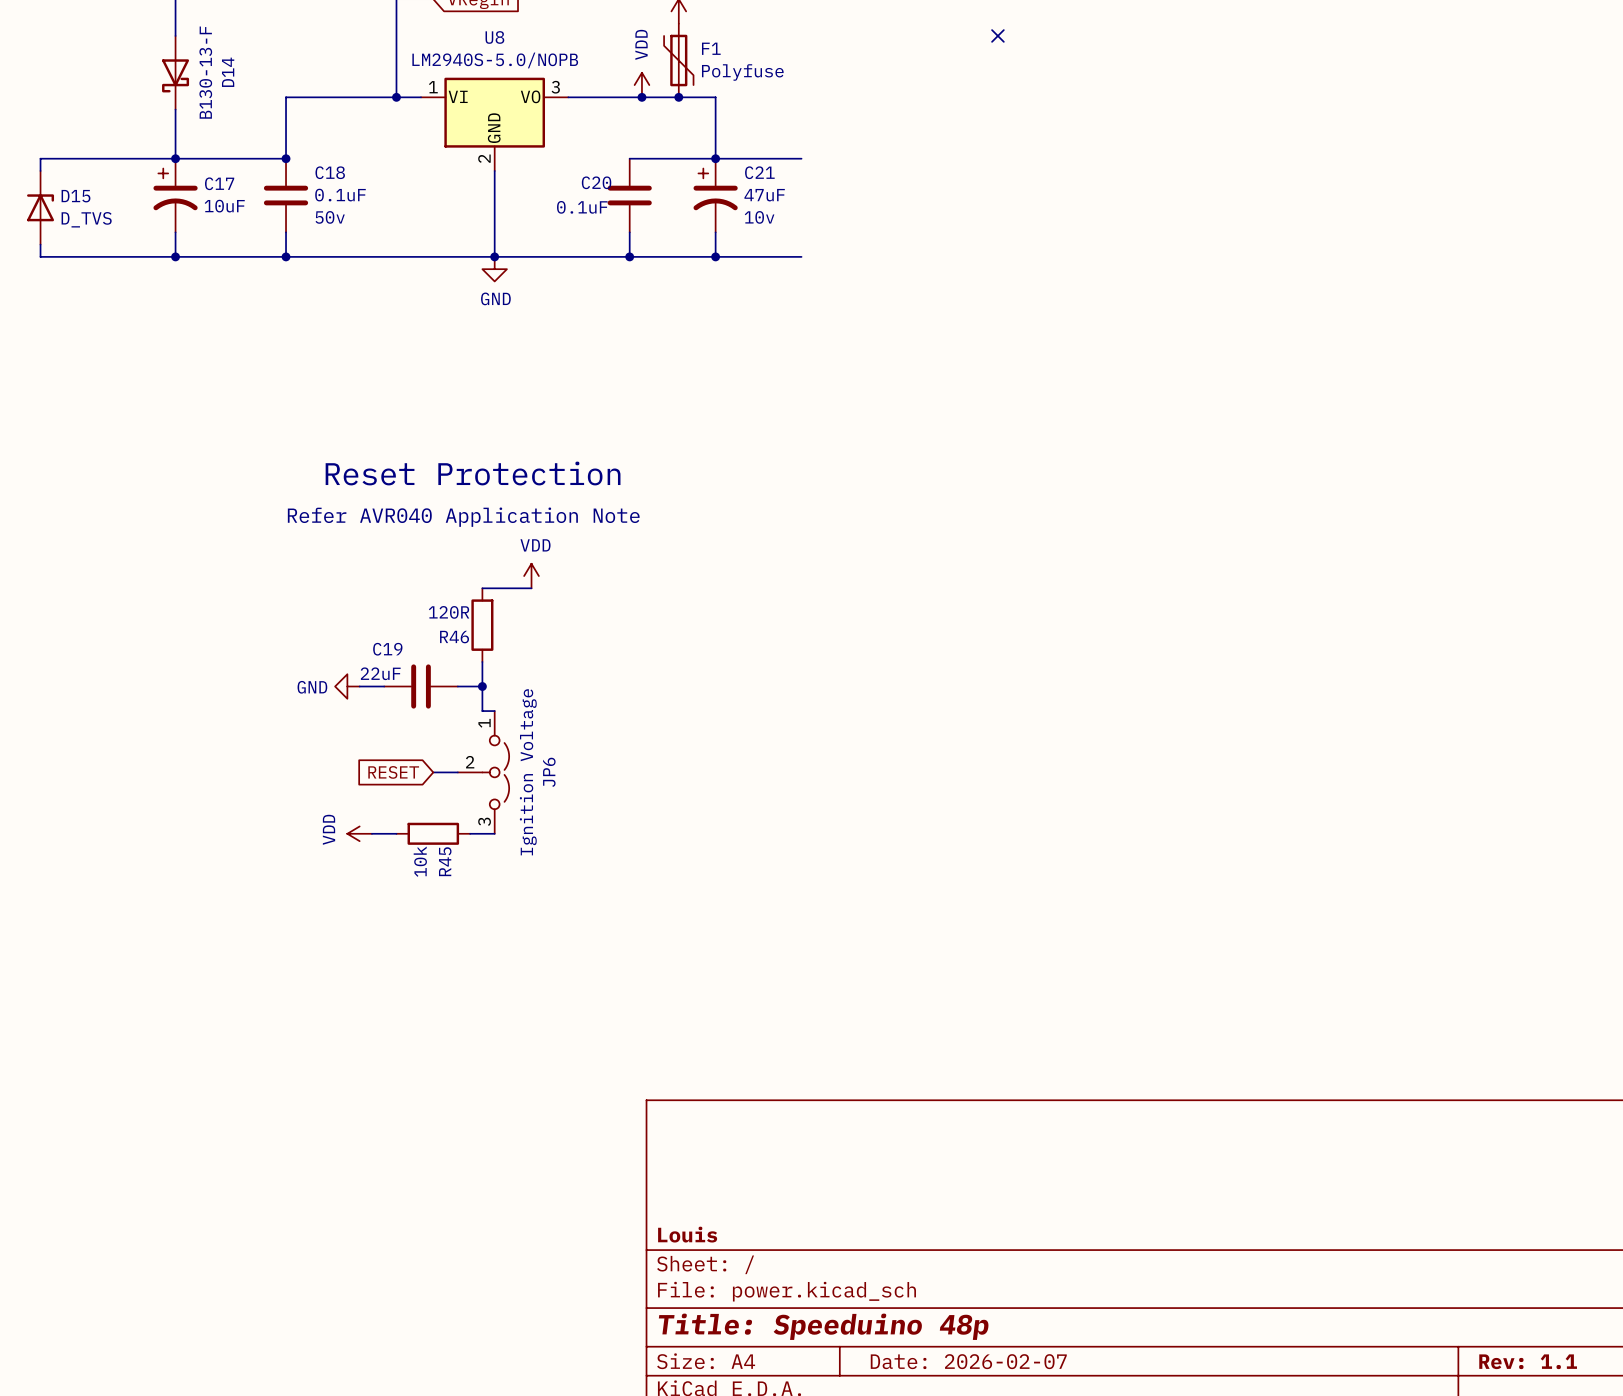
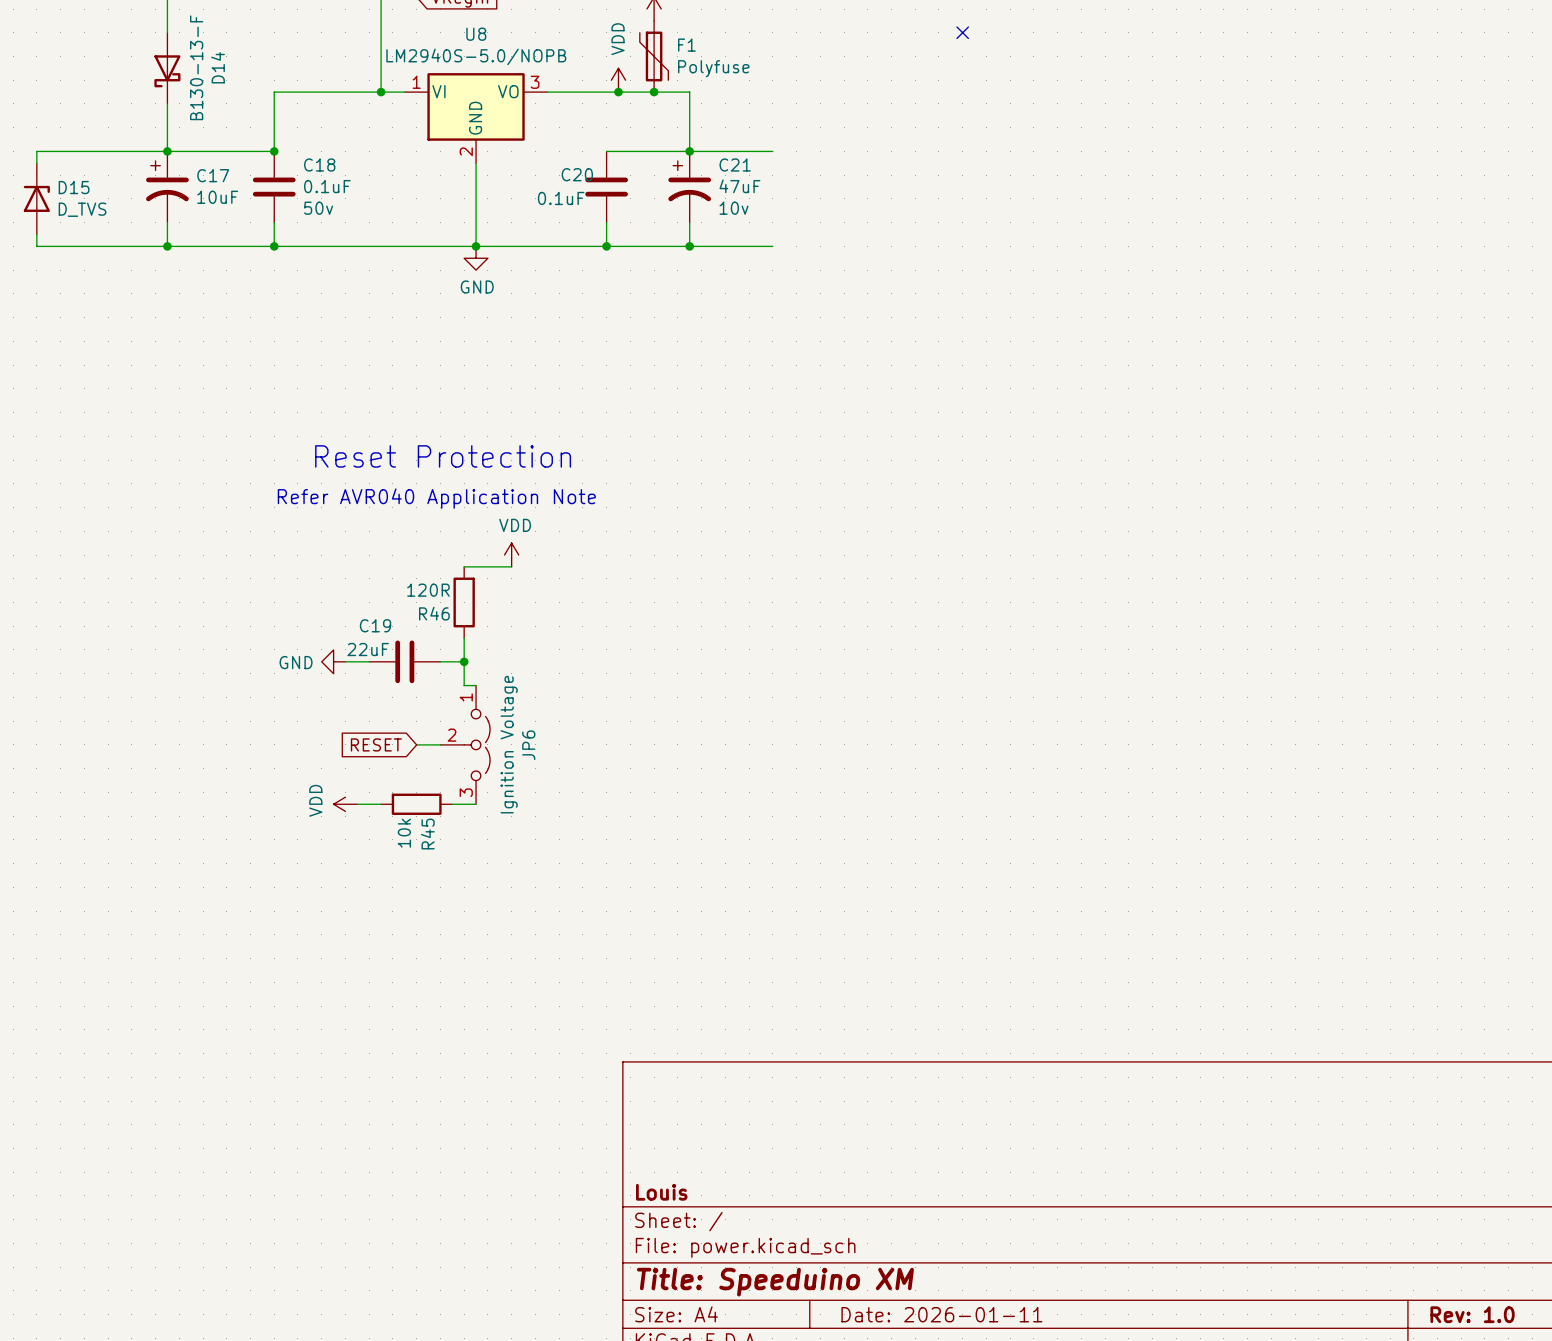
title block: Title: Speeduino 48p (823, 1326) -> Title: Speeduino XM (775, 1282)
title block: Date: 2026-02-07 (968, 1361) -> Date: 2026-01-11 (941, 1314)
title block: Rev: 1.1 (1528, 1361) -> Rev: 1.0 (1472, 1314)

